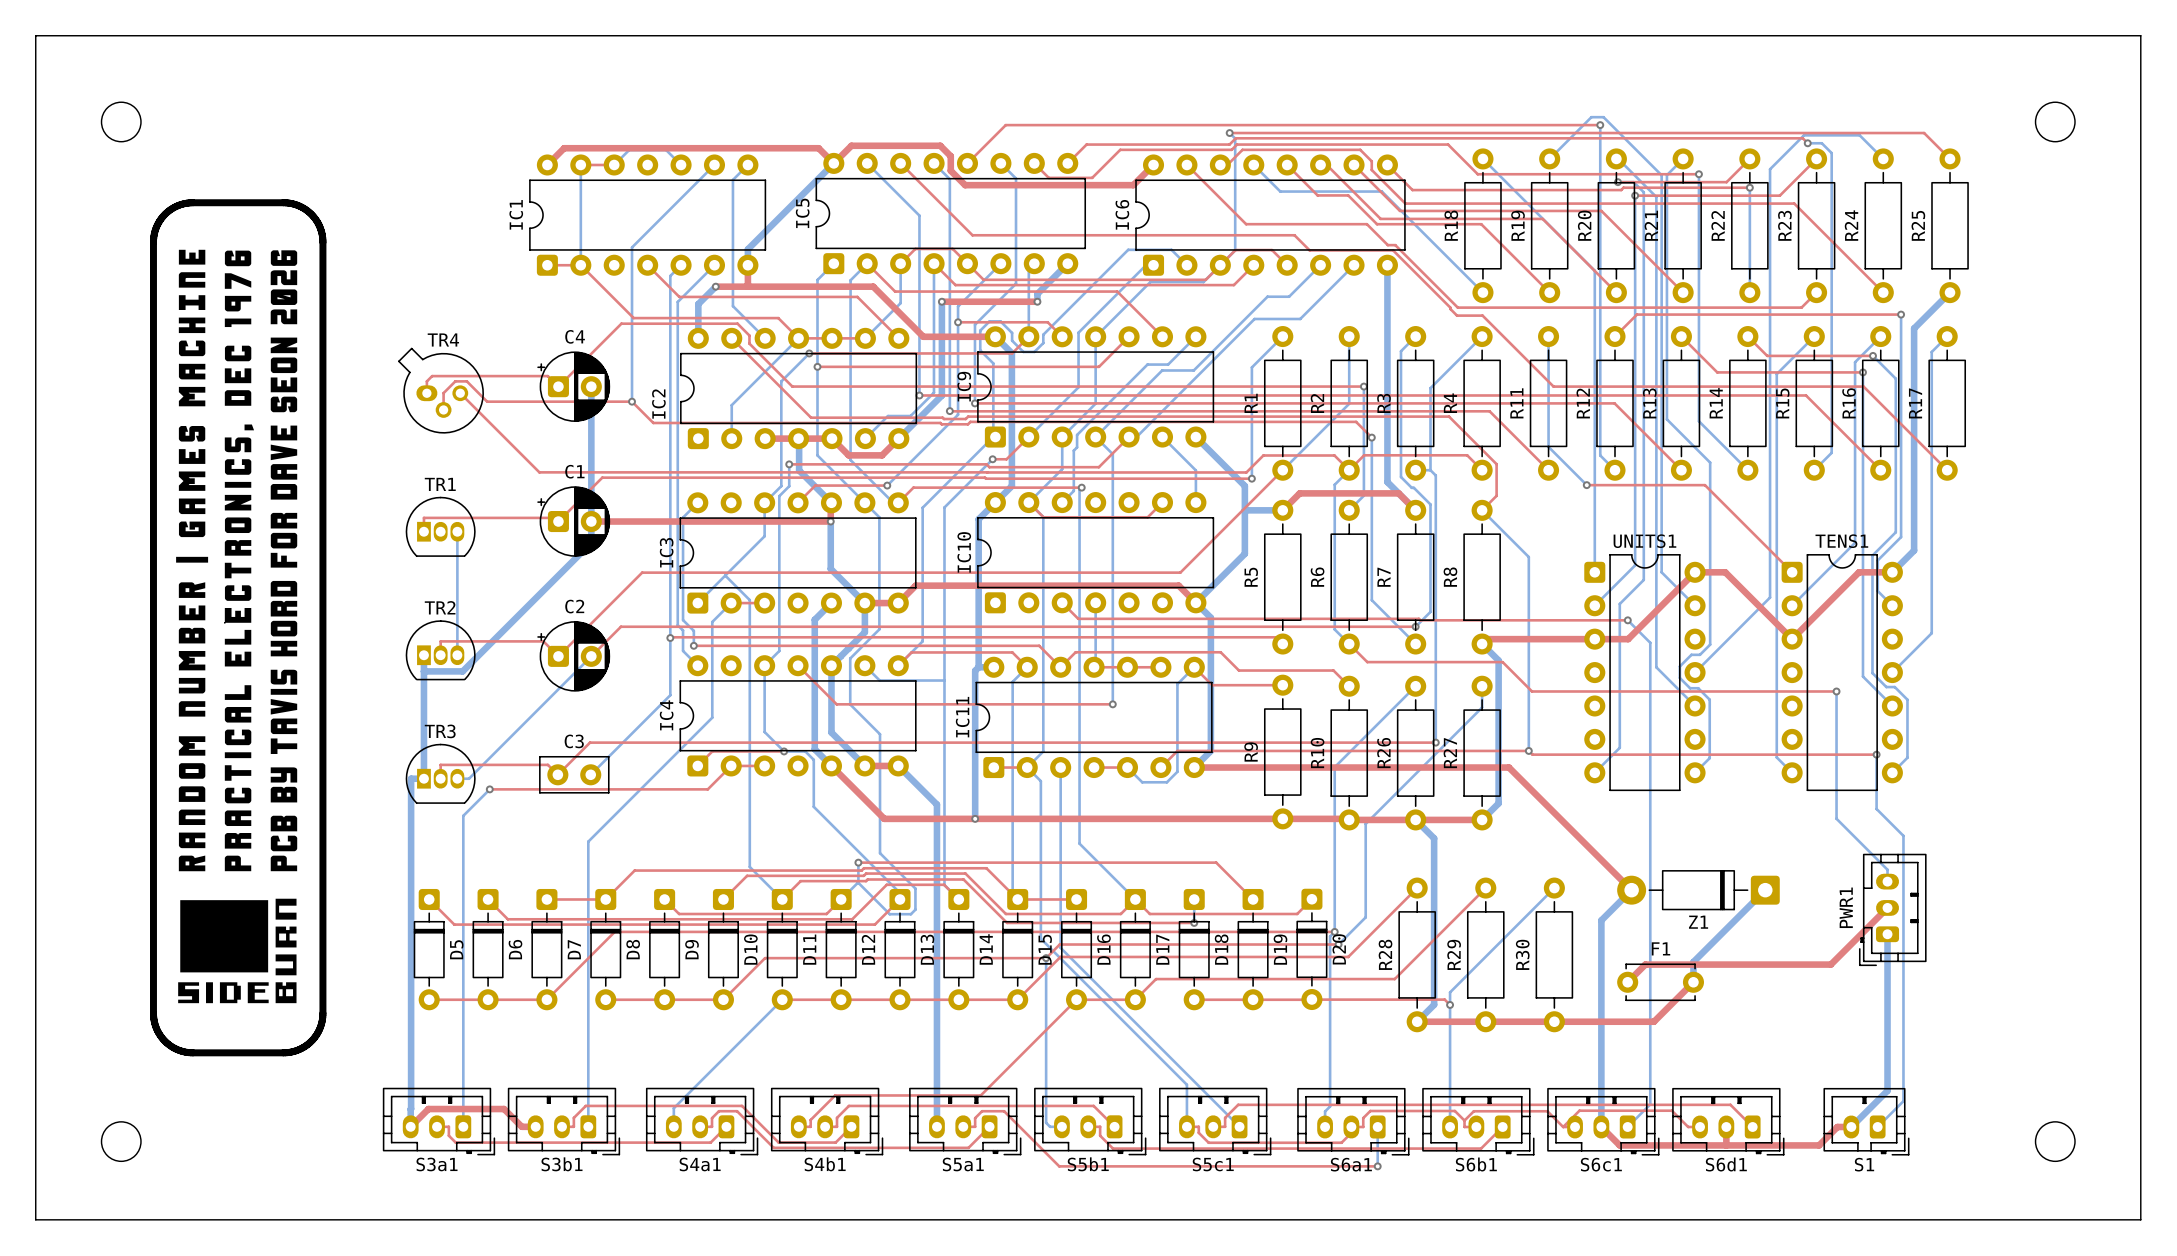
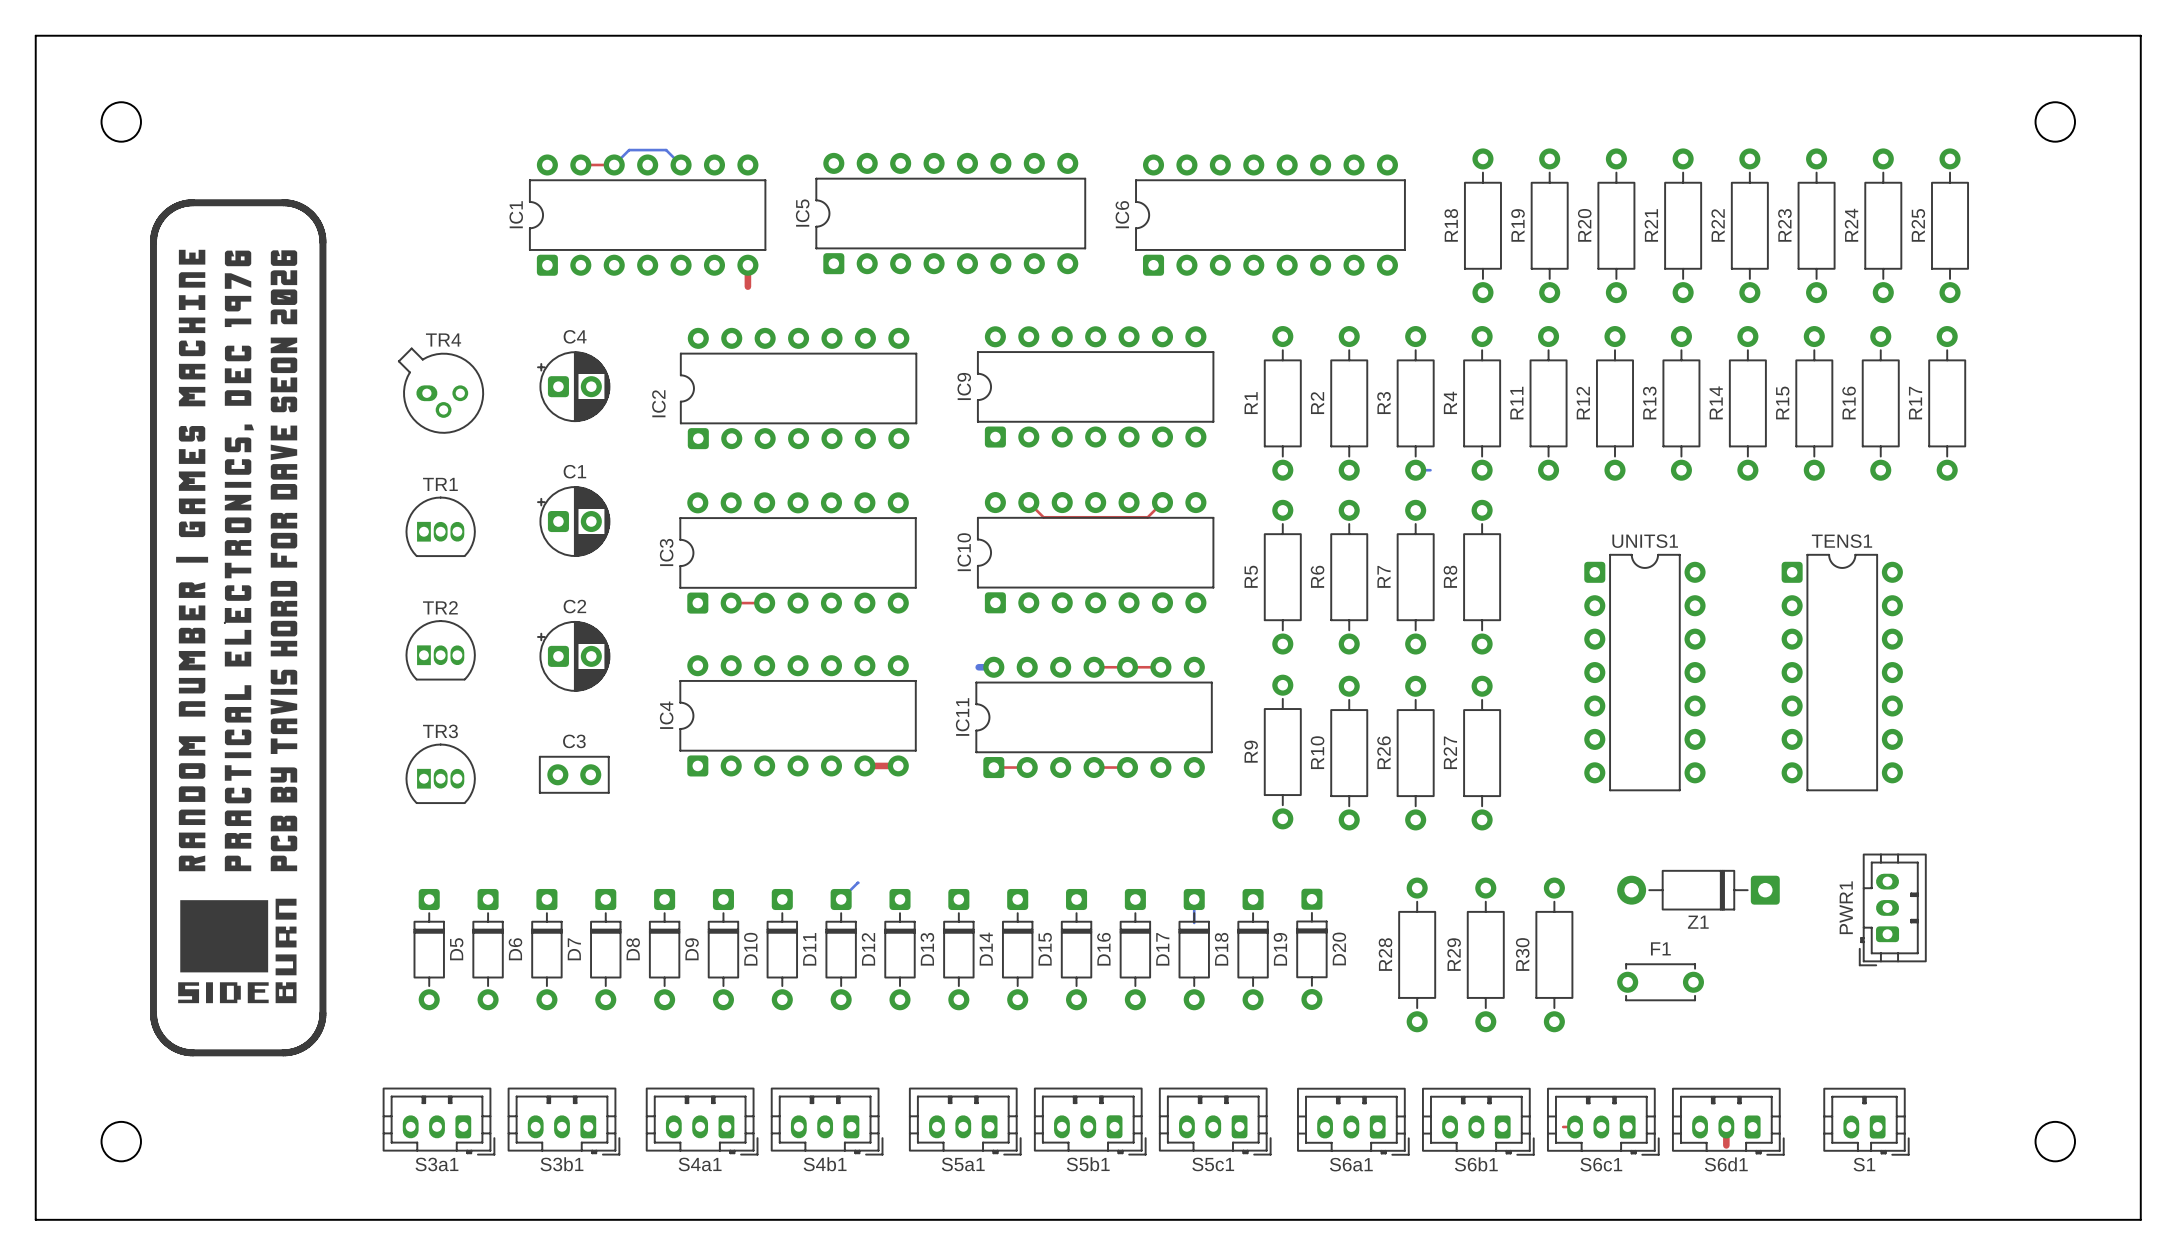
top track: (1600, 125) (1005, 125) (967, 163) -> none
bottom track: (1600, 125) (1600, 455) (1614, 470) -> none
via: (1600, 125) -> none
top track: (1229, 133) (1924, 133) (1950, 158) -> none
bottom track: (1229, 133) (1235, 138) (1235, 250) (1203, 282) (1150, 282) (1095, 336) (1095, 403) (1062, 437) (1062, 469) (1028, 502) (1043, 517) (1043, 751) (1027, 767) (1040, 781) (1040, 938) (1186, 1084) (1186, 1126) -> none
via: (1229, 133) -> none
top track: (1807, 143) (1802, 138) (1235, 138) (1229, 144) (1086, 144) (1067, 163) -> none
bottom track: (1807, 143) (1821, 143) (1831, 153) (1831, 452) (1814, 470) -> none
via: (1807, 143) -> none
bottom track: (1482, 158) (1594, 270) (1594, 572) -> none
bottom track: (1549, 158) (1591, 117) (1603, 117) (1661, 175) (1661, 572) (1695, 605) -> none
bottom track: (1616, 158) (1656, 197) (1656, 667) (1695, 705) -> none
bottom track: (1683, 158) (1666, 175) (1666, 419) (1710, 462) (1710, 644) (1699, 654) (1691, 654) (1679, 666) (1679, 678) (1690, 688) (1698, 688) (1709, 699) (1709, 758) (1695, 772) -> none
top track: (1749, 158) (1726, 182) (1617, 182) -> none
top track: (1816, 158) (1779, 195) (1635, 195) -> none
bottom track: (1883, 158) (1859, 135) (1803, 135) (1770, 169) (1770, 597) (1695, 672) -> none
bottom track: (833, 163) (747, 249) (747, 265) -> none
bottom track: (867, 163) (919, 215) (919, 395) -> none
top track: (900, 163) (972, 235) (1294, 235) (1309, 250) (1393, 250) (1457, 315) (1482, 315) (1553, 386) (1863, 386) (1947, 470) -> none
bottom track: (934, 163) (949, 179) (949, 411) -> none
bottom track: (1000, 163) (1016, 178) (1016, 283) (974, 324) (974, 403) -> none
top track: (1034, 163) (1048, 177) (1092, 177) (1120, 149) (1231, 149) (1237, 144) (1448, 144) (1477, 174) (1698, 174) -> none
top track: (547, 164) (564, 148) (818, 148) (833, 163) (851, 145) (940, 145) (950, 156) (950, 170) (965, 185) (1133, 185) (1153, 164) -> none
bottom track: (580, 164) (580, 265) -> none
bottom track: (714, 164) (632, 247) (632, 401) -> none
bottom track: (747, 164) (732, 179) (732, 306) (765, 338) -> none
top track: (1186, 164) (1246, 224) (1366, 224) (1387, 245) (1395, 245) (1457, 307) (1801, 307) (1816, 292) -> none
top track: (1220, 164) (1227, 164) (1242, 149) (1360, 149) (1371, 161) (1371, 169) (1405, 203) (1794, 203) (1883, 292) -> none
bottom track: (1253, 164) (1280, 191) (1381, 191) (1482, 292) -> none
top track: (1287, 164) (1317, 195) (1348, 195) (1377, 224) (1481, 224) (1549, 292) -> none
top track: (1320, 164) (1326, 164) (1380, 218) (1542, 218) (1616, 292) -> none
top track: (1354, 164) (1399, 210) (1601, 210) (1683, 292) -> none
top track: (1387, 164) (1412, 190) (1749, 187) -> none
bottom track: (1698, 174) (1698, 421) (1747, 470) -> none
via: (1698, 174) -> none
bottom track: (1617, 182) (1633, 182) (1643, 192) (1643, 579) (1619, 603) (1619, 747) (1594, 772) -> none
via: (1617, 182) -> none
bottom track: (1749, 187) (1749, 292) -> none
via: (1749, 187) -> none
bottom track: (1635, 195) (1635, 565) (1594, 605) -> none
via: (1635, 195) -> none
bottom track: (833, 263) (817, 279) (817, 455) (879, 517) (879, 629) (850, 658) (850, 704) (880, 734) (880, 853) (915, 888) (915, 909) (910, 914) (889, 914) (858, 882) (858, 862) -> none
top track: (867, 263) (895, 291) (1117, 291) (1162, 336) -> none
bottom track: (867, 263) (850, 280) (850, 460) (893, 502) (898, 502) -> none
top track: (900, 263) (915, 248) (952, 248) (983, 279) (1205, 279) (1235, 250) (1272, 250) (1287, 265) -> none
bottom track: (900, 263) (900, 303) (865, 338) -> none
bottom track: (933, 263) (933, 392) (910, 416) (887, 416) (865, 438) -> none
top track: (934, 263) (955, 285) (1233, 285) (1253, 265) -> none
bottom track: (1000, 263) (958, 306) (958, 414) (887, 485) -> none
bottom track: (1034, 263) (1028, 269) (1028, 336) -> none
bottom track: (1067, 263) (1037, 293) (1037, 301) -> none
top track: (547, 265) (580, 265) (633, 318) (778, 318) (798, 338) (865, 338) -> none
top track: (647, 265) (679, 296) (857, 296) (898, 338) -> none
bottom track: (681, 265) (670, 275) (670, 695) (590, 774) -> none
bottom track: (714, 265) (677, 301) (677, 625) (683, 630) (683, 650) (697, 665) -> none
bottom track: (1153, 265) (1145, 265) (1078, 332) (1078, 387) (1028, 437) -> none
bottom track: (1186, 265) (1171, 249) (1128, 249) (1043, 334) (1043, 343) (1034, 351) (1023, 351) (1012, 340) (1012, 332) (1000, 321) (989, 321) (980, 330) (980, 350) (993, 363) (993, 437) -> none
bottom track: (1320, 265) (1289, 296) (1267, 296) (1193, 370) (1162, 370) (1095, 437) (1112, 454) (1112, 704) -> none
bottom track: (1354, 265) (1300, 318) (1254, 318) (1136, 437) (1129, 437) -> none
bottom track: (1387, 265) (1387, 482) (1415, 510) -> none
top track: (715, 286) (873, 286) (923, 336) (995, 336) -> none
bottom track: (715, 286) (698, 304) (698, 338) -> none
via: (715, 286) -> none
bottom track: (1950, 292) (1914, 328) (1914, 550) (1892, 572) -> none
top track: (941, 301) (1037, 301) -> none
bottom track: (941, 301) (941, 395) (898, 438) -> none
via: (941, 301) -> none
via: (1037, 301) -> none
top track: (1901, 314) (1636, 314) (1614, 336) -> none
bottom track: (1901, 314) (1901, 537) (1877, 560) (1877, 591) (1892, 605) -> none
via: (1901, 314) -> none
top track: (958, 322) (1047, 322) (1062, 336) -> none
via: (958, 322) -> none
bottom track: (995, 336) (1011, 353) (1011, 486) (978, 519) (978, 667) (975, 670) (975, 818) -> none
top track: (1028, 336) (1012, 353) (809, 353) -> none
top track: (1129, 336) (1099, 366) (817, 366) -> none
bottom track: (1195, 336) (1168, 364) (1147, 364) (1077, 434) (1077, 447) (1073, 450) (1073, 490) (1062, 502) -> none
bottom track: (1282, 336) (1251, 367) (1251, 478) -> none
bottom track: (1349, 336) (1349, 403) (1282, 470) -> none
bottom track: (1415, 336) (1400, 351) (1400, 477) (1430, 504) (1430, 611) (1415, 626) -> none
bottom track: (1482, 336) (1430, 388) (1430, 470) (1435, 475) (1435, 742) -> none
bottom track: (1548, 336) (1548, 446) (1586, 485) -> none
top track: (1681, 336) (1717, 372) (1862, 372) -> none
top track: (1747, 336) (1767, 355) (1872, 355) -> none
bottom track: (1814, 336) (1776, 374) (1776, 757) (1792, 772) -> none
bottom track: (1880, 336) (1855, 362) (1855, 542) (1792, 605) -> none
bottom track: (1947, 336) (1931, 352) (1931, 633) (1892, 672) -> none
top track: (731, 338) (811, 417) (965, 419) (968, 416) (1449, 416) (1496, 464) (1496, 495) (1482, 510) -> none
bottom track: (798, 338) (731, 405) (731, 438) -> none
bottom track: (809, 353) (781, 381) (781, 486) (764, 502) (764, 536) (697, 603) -> none
via: (809, 353) -> none
bottom track: (1872, 355) (1895, 378) (1895, 532) (1872, 555) (1872, 673) (1886, 687) (1894, 687) (1907, 699) (1907, 757) (1892, 772) -> none
via: (1872, 355) -> none
via: (817, 366) -> none
bottom track: (1862, 372) (1862, 676) (1892, 705) -> none
via: (1862, 372) -> none
bottom track: (591, 386) (591, 542) (462, 671) (423, 671) -> none
top track: (1363, 386) (792, 386) (749, 343) (749, 335) (737, 323) (621, 323) (558, 386) (547, 376) (432, 376) (426, 381) (426, 393) -> none
bottom track: (1363, 386) (1363, 495) (1349, 510) -> none
via: (1363, 386) -> none
top track: (460, 393) (539, 472) (987, 472) -> none
top track: (919, 395) (1806, 395) (1880, 470) -> none
via: (919, 395) -> none
via: (632, 401) -> none
top track: (974, 403) (1614, 403) (1681, 470) -> none
via: (974, 403) -> none
top track: (443, 409) (443, 393) (455, 381) (466, 381) (487, 401) (632, 401) (653, 422) (967, 424) (970, 421) (1356, 421) (1371, 437) -> none
top track: (949, 411) (1489, 411) (1548, 470) -> none
via: (949, 411) -> none
bottom track: (993, 437) (922, 507) (922, 641) (898, 665) -> none
top track: (1028, 437) (1006, 459) (992, 459) -> none
top track: (1129, 437) (1098, 467) (989, 467) (986, 464) (789, 464) -> none
bottom track: (1162, 437) (1195, 470) (1195, 502) -> none
bottom track: (1195, 437) (1244, 485) (1244, 553) (1195, 602) (1210, 617) (1210, 750) (1194, 767) -> none
bottom track: (1371, 437) (1371, 600) (1415, 644) -> none
via: (1371, 437) -> none
top track: (765, 438) (831, 438) (848, 455) (882, 455) (898, 438) -> none
bottom track: (798, 438) (799, 470) (831, 502) -> none
bottom track: (992, 459) (944, 507) (944, 885) (958, 899) -> none
via: (992, 459) -> none
bottom track: (789, 464) (789, 486) (779, 496) (779, 651) (764, 665) (764, 732) (784, 751) (805, 751) (813, 759) (813, 806) (900, 893) (900, 899) -> none
via: (789, 464) -> none
top track: (1282, 470) (1180, 572) (642, 572) (558, 656) (543, 641) (440, 641) (440, 655) -> none
bottom track: (1349, 470) (1334, 484) (1334, 629) (1349, 644) -> none
top track: (1482, 470) (1467, 455) (1364, 455) (1349, 470) (1334, 455) (1263, 455) (1246, 472) (987, 472) -> none
top track: (1251, 478) (602, 477) (558, 521) (554, 517) (423, 517) (423, 531) -> none
via: (1251, 478) -> none
top track: (887, 485) (815, 485) (798, 502) -> none
via: (887, 485) -> none
top track: (1586, 485) (1704, 485) (1792, 572) -> none
via: (1586, 485) -> none
top track: (1081, 487) (913, 487) (898, 502) -> none
bottom track: (1081, 487) (1079, 489) (1079, 843) (1135, 899) -> none
via: (1081, 487) -> none
bottom track: (697, 502) (683, 517) (683, 620) (693, 630) (693, 645) -> none
top track: (831, 502) (830, 521) (591, 521) -> none
bottom track: (1244, 510) (1282, 510) -> none
top track: (1282, 510) (1299, 493) (1398, 493) (1415, 510) -> none
bottom track: (1482, 510) (1528, 557) (1528, 750) -> none
bottom track: (830, 521) (830, 568) (864, 603) (864, 632) (831, 665) (831, 732) (864, 765) -> none
via: (830, 521) -> none
bottom track: (457, 531) (457, 655) -> none
top track: (1892, 572) (1858, 572) (1792, 639) (1725, 572) (1695, 572) (1628, 639) (1486, 639) (1482, 644) -> none
bottom track: (725, 575) (749, 600) (749, 866) (782, 899) -> none
top track: (1062, 602) (1078, 618) (1627, 620) -> none
bottom track: (1095, 602) (1095, 665) (1094, 667) -> none
top track: (1195, 602) (1178, 585) (915, 585) (898, 603) (864, 603) -> none
bottom track: (731, 603) (712, 621) (712, 717) (588, 841) (588, 1126) -> none
bottom track: (831, 603) (814, 619) (814, 749) (831, 765) -> none
bottom track: (1627, 620) (1650, 642) (1650, 1104) (1627, 1126) -> none
via: (1627, 620) -> none
top track: (1415, 626) (620, 626) (591, 656) -> none
via: (1415, 626) -> none
top track: (670, 638) (1276, 637) (1282, 644) -> none
via: (670, 638) -> none
top track: (1349, 644) (1367, 662) (1502, 662) (1532, 691) (1836, 691) -> none
bottom track: (1482, 644) (1498, 660) (1498, 803) (1482, 819) -> none
top track: (693, 645) (1039, 645) (1060, 667) (1075, 652) (1220, 652) (1238, 670) (1333, 670) (1349, 686) -> none
via: (693, 645) -> none
bottom track: (423, 655) (423, 778) (411, 778) (410, 1126) -> none
bottom track: (591, 656) (468, 778) (457, 778) -> none
top track: (798, 665) (836, 704) (1112, 704) -> none
bottom track: (864, 665) (879, 680) (944, 680) -> none
top track: (898, 665) (911, 652) (1012, 652) (1027, 667) -> none
bottom track: (1027, 667) (1012, 681) (1012, 894) (1017, 899) -> none
top track: (1194, 667) (1212, 685) (1282, 685) -> none
bottom track: (1194, 667) (1177, 684) (1177, 771) (1166, 782) (1142, 782) (1127, 767) -> none
bottom track: (1415, 686) (1334, 767) (1334, 931) (1330, 936) (1330, 1106) (1325, 1111) (1325, 1126) -> none
bottom track: (1482, 686) (1482, 707) (1365, 823) (1365, 917) (1338, 944) -> none
bottom track: (1836, 691) (1836, 818) (1887, 869) (1887, 881) -> none
via: (1836, 691) -> none
via: (1112, 704) -> none
top track: (1435, 742) (590, 742) (557, 774) (547, 764) (440, 764) (440, 778) -> none
via: (1435, 742) -> none
via: (1528, 750) -> none
top track: (784, 751) (712, 751) (697, 765) -> none
via: (784, 751) -> none
top track: (1876, 754) (1532, 754) (1528, 750) (1177, 750) (1160, 767) -> none
bottom track: (1876, 754) (1876, 809) (1903, 835) (1903, 1101) (1877, 1126) -> none
via: (1876, 754) -> none
top track: (764, 765) (731, 765) (707, 789) (489, 789) -> none
top track: (831, 765) (884, 818) (1482, 819) -> none
bottom track: (898, 765) (936, 804) (936, 1126) -> none
bottom track: (1060, 767) (1060, 947) (1239, 1126) -> none
top track: (1194, 767) (1508, 767) (1631, 890) -> none
bottom track: (489, 789) (463, 815) (463, 1126) -> none
via: (489, 789) -> none
via: (975, 818) -> none
bottom track: (1415, 819) (1434, 838) (1434, 1004) (1417, 1021) -> none
top track: (858, 862) (1216, 862) (1253, 899) -> none
via: (858, 862) -> none
top track: (1417, 888) (1348, 956) (1060, 956) (1017, 999) (782, 999) -> none
top track: (1485, 888) (1394, 979) (1156, 979) (1135, 999) (1076, 999) (980, 1095) (835, 1095) (810, 1119) (810, 1126) (798, 1126) -> none
bottom track: (1554, 888) (1450, 992) (1450, 1126) -> none
bottom track: (1631, 890) (1601, 920) (1601, 1126) -> none
bottom track: (1765, 890) (1693, 962) (1693, 982) -> none
top track: (429, 899) (454, 924) (874, 924) (900, 899) -> none
top track: (488, 899) (507, 919) (852, 919) (886, 884) (944, 884) (958, 899) -> none
top track: (546, 899) (605, 899) (634, 870) (861, 870) (863, 868) (986, 868) (1017, 899) (1076, 899) -> none
top track: (664, 899) (679, 914) (826, 914) (841, 899) -> none
top track: (782, 899) (800, 881) (963, 879) (1007, 922) (1194, 922) -> none
top track: (1311, 899) (1297, 914) (1149, 914) (1135, 899) (1120, 914) (1005, 914) (965, 873) (866, 873) (863, 875) (747, 875) (723, 899) -> none
top track: (1887, 907) (1830, 964) (1645, 964) (1627, 982) -> none
via: (1194, 922) -> none
top track: (1334, 931) (614, 931) (546, 999) (429, 999) -> none
via: (1334, 931) -> none
bottom track: (1887, 934) (1887, 1090) (1851, 1126) -> none
top track: (1338, 944) (1059, 944) (1046, 958) (765, 958) (723, 999) (605, 999) -> none
via: (1338, 944) -> none
bottom track: (1046, 958) (1046, 1122) (1050, 1126) (1061, 1126) -> none
via: (1046, 958) -> none
top track: (1693, 982) (1653, 1021) (1417, 1021) -> none
bottom track: (782, 999) (673, 1108) (673, 1126) -> none
top track: (1194, 999) (1311, 999) -> none
top track: (1311, 999) (1444, 999) (1450, 1004) -> none
via: (1450, 1004) -> none
top track: (1464, 1120) (1473, 1111) (1547, 1111) (1563, 1126) (1579, 1110) (1671, 1110) (1688, 1126) (1700, 1126) -> none
top track: (1464, 1120) (1464, 1126) (1476, 1126) -> none
top track: (1464, 1120) (1454, 1111) (1370, 1111) (1363, 1118) (1363, 1126) (1351, 1126) -> none
top track: (410, 1126) (428, 1109) (504, 1109) (521, 1126) (535, 1126) -> none
top track: (437, 1126) (448, 1126) (448, 1135) (455, 1142) (710, 1142) (726, 1126) -> none
top track: (562, 1126) (573, 1126) (573, 1117) (585, 1105) (742, 1105) (778, 1142) (835, 1142) (851, 1126) -> none
top track: (700, 1126) (712, 1126) (712, 1118) (718, 1111) (737, 1111) (773, 1147) (968, 1147) (989, 1126) -> none
top track: (825, 1126) (836, 1126) (836, 1117) (848, 1105) (1093, 1105) (1114, 1126) -> none
top track: (963, 1126) (975, 1126) (975, 1118) (982, 1111) (1004, 1111) (1059, 1166) (1377, 1166) -> none
top track: (1088, 1126) (1100, 1126) (1100, 1135) (1112, 1148) (1481, 1148) (1502, 1126) -> none
top track: (1186, 1126) (1198, 1126) (1198, 1132) (1208, 1142) (1341, 1142) (1357, 1126) -> none
top track: (1213, 1126) (1225, 1126) (1225, 1117) (1238, 1104) (1730, 1104) (1752, 1126) -> none
bottom track: (1377, 1126) (1377, 1166) -> none
top track: (1601, 1126) (1619, 1145) (1819, 1145) (1837, 1126) (1851, 1126) -> none
via: (1377, 1166) -> none

